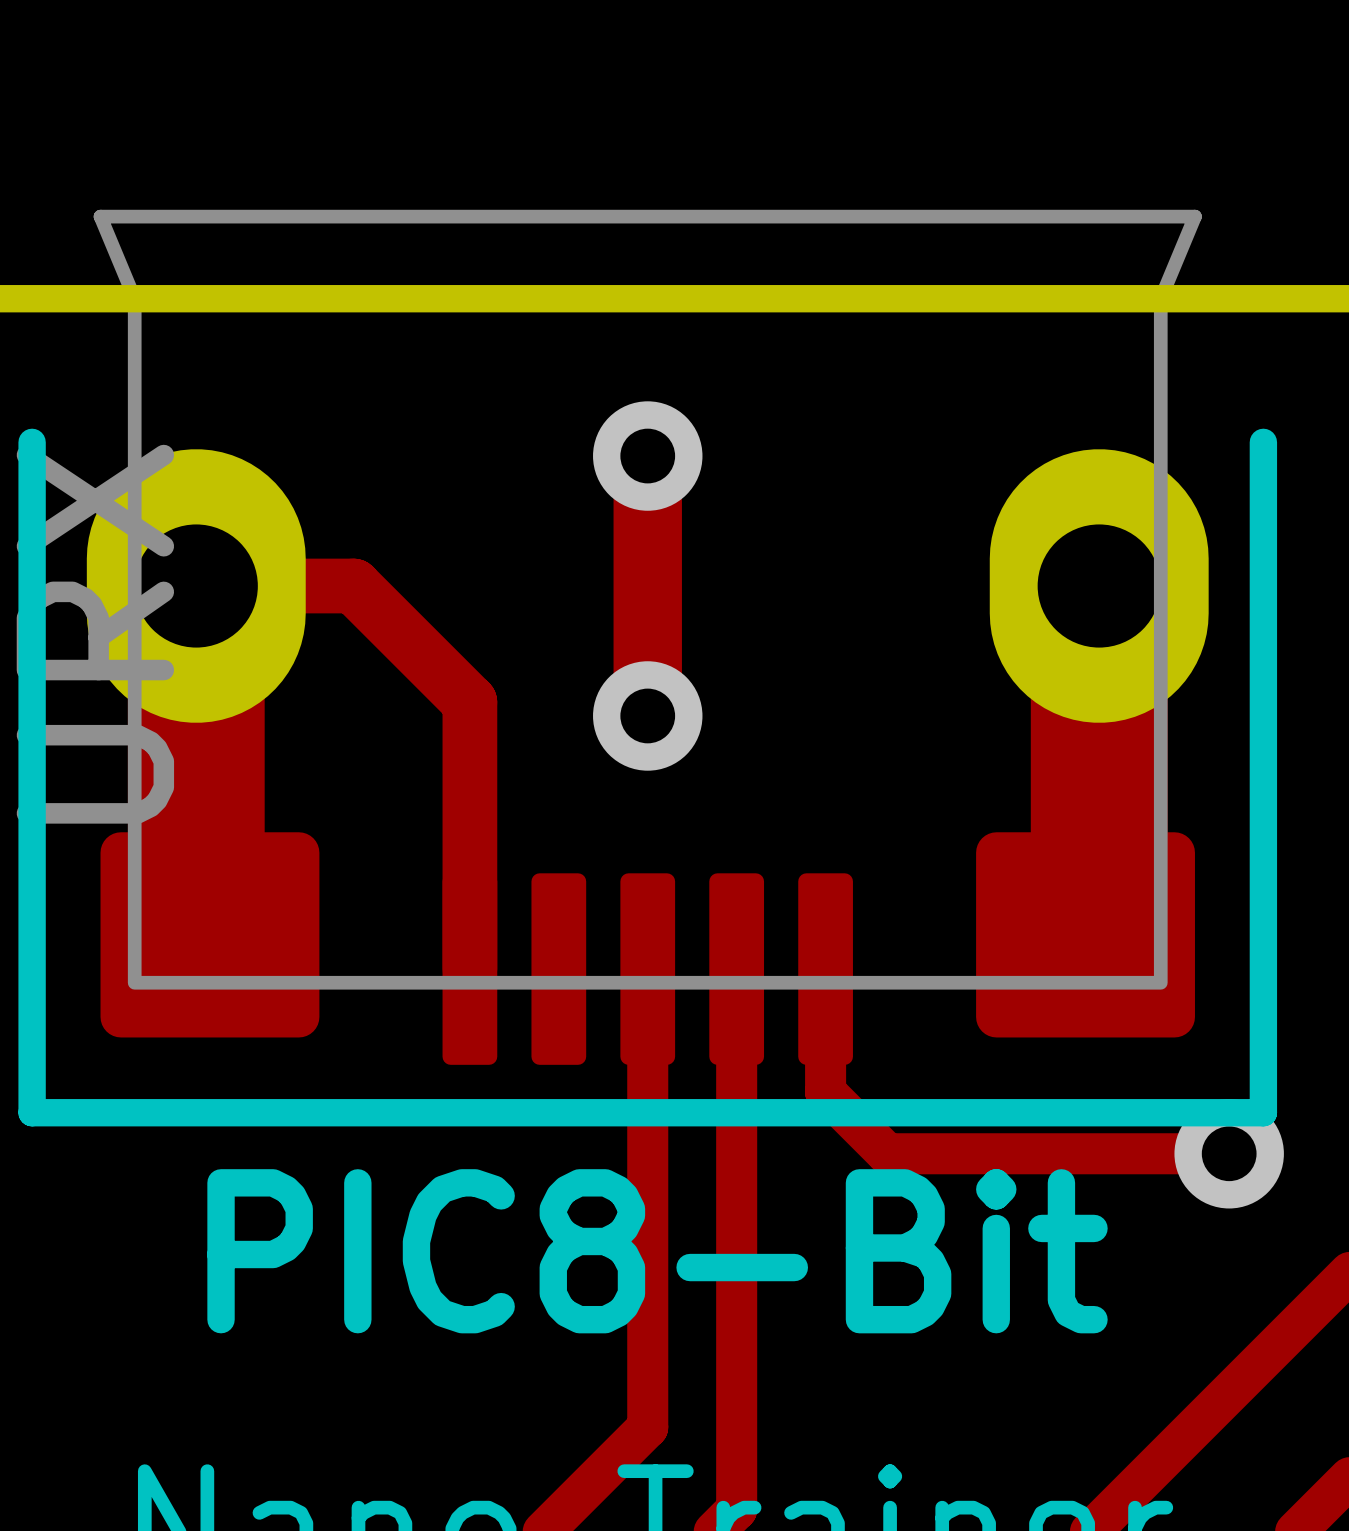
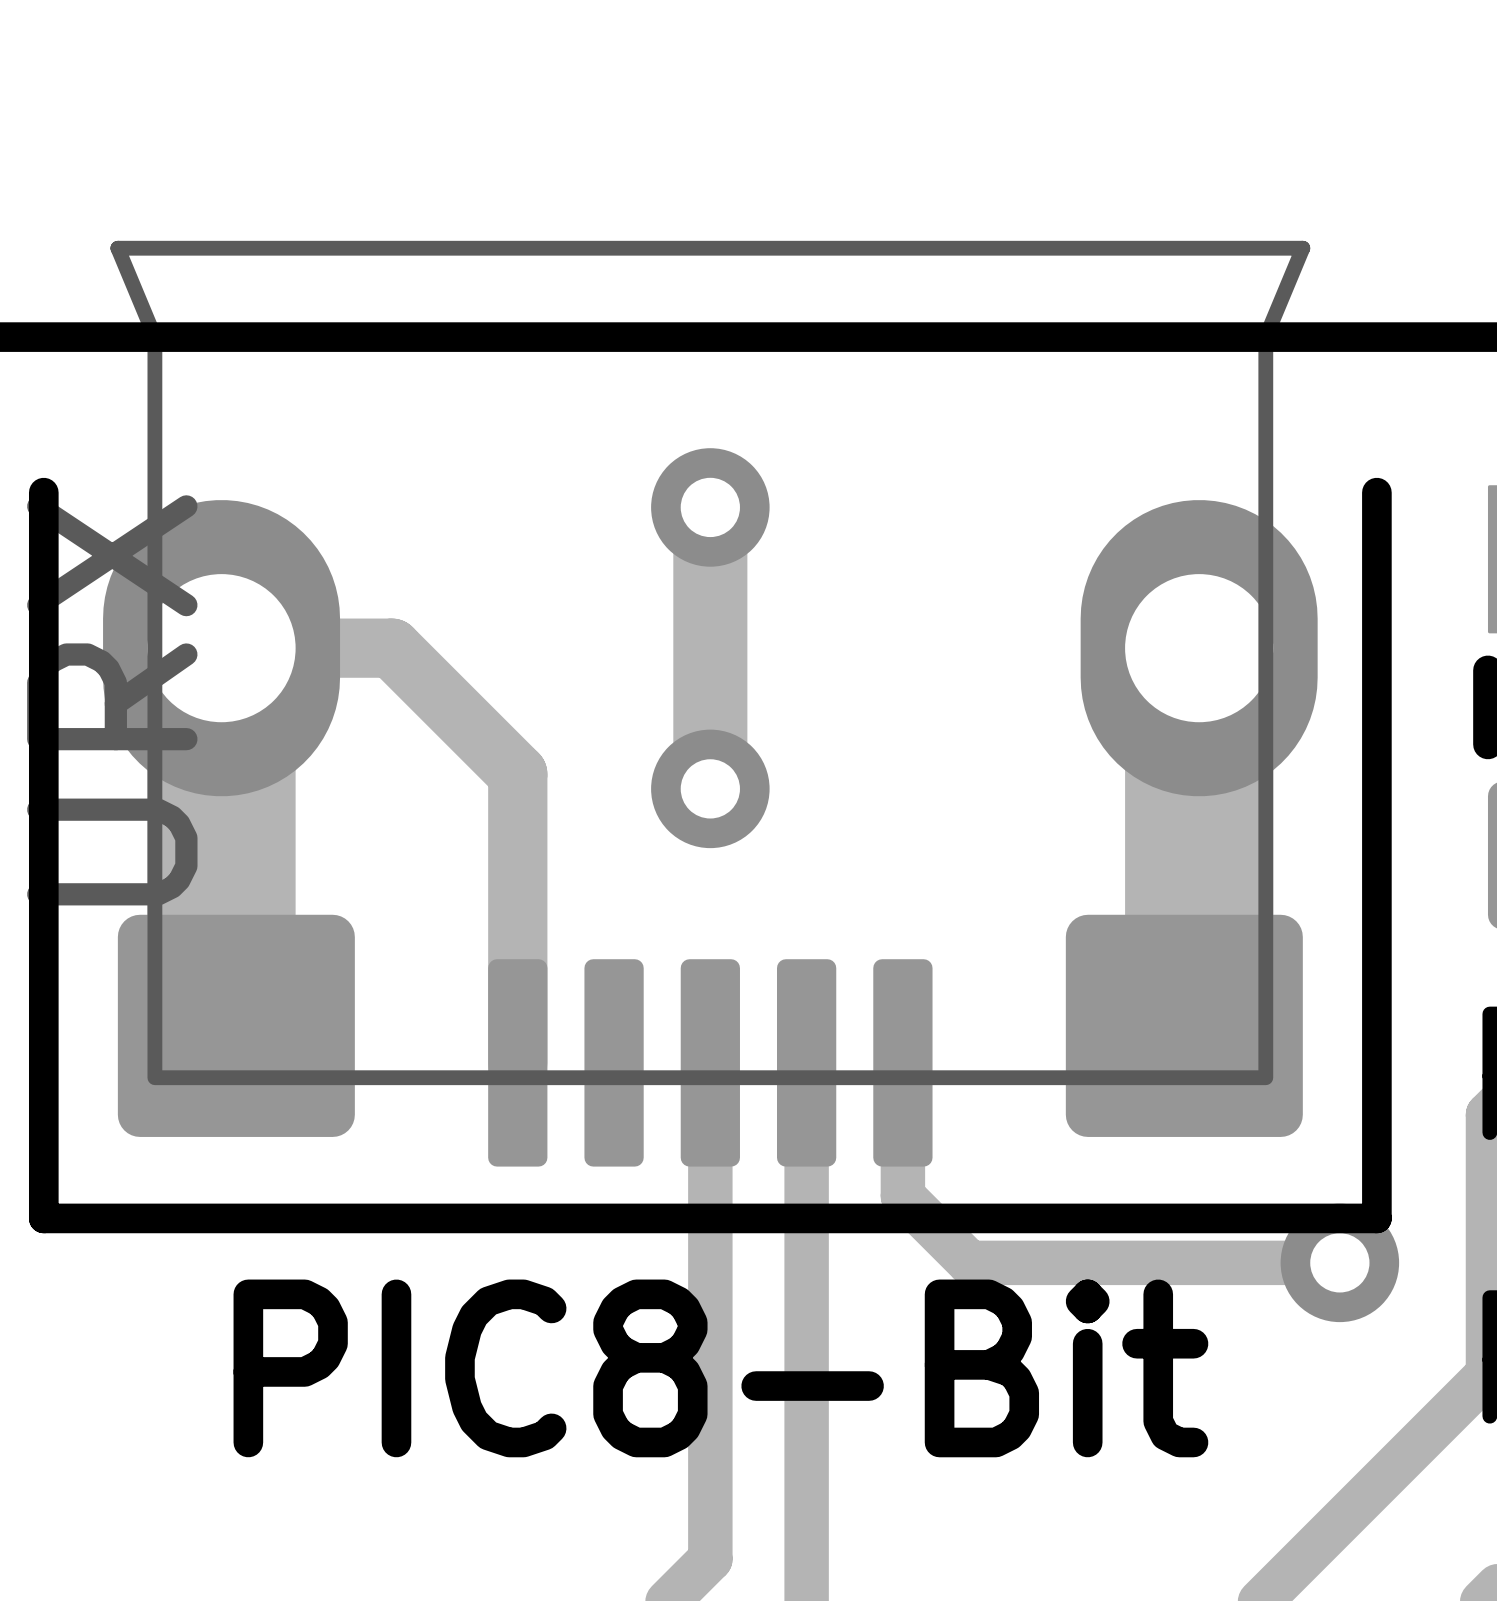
part footprint: [18, 209, 1278, 1127] -> [28, 240, 1392, 1234]

